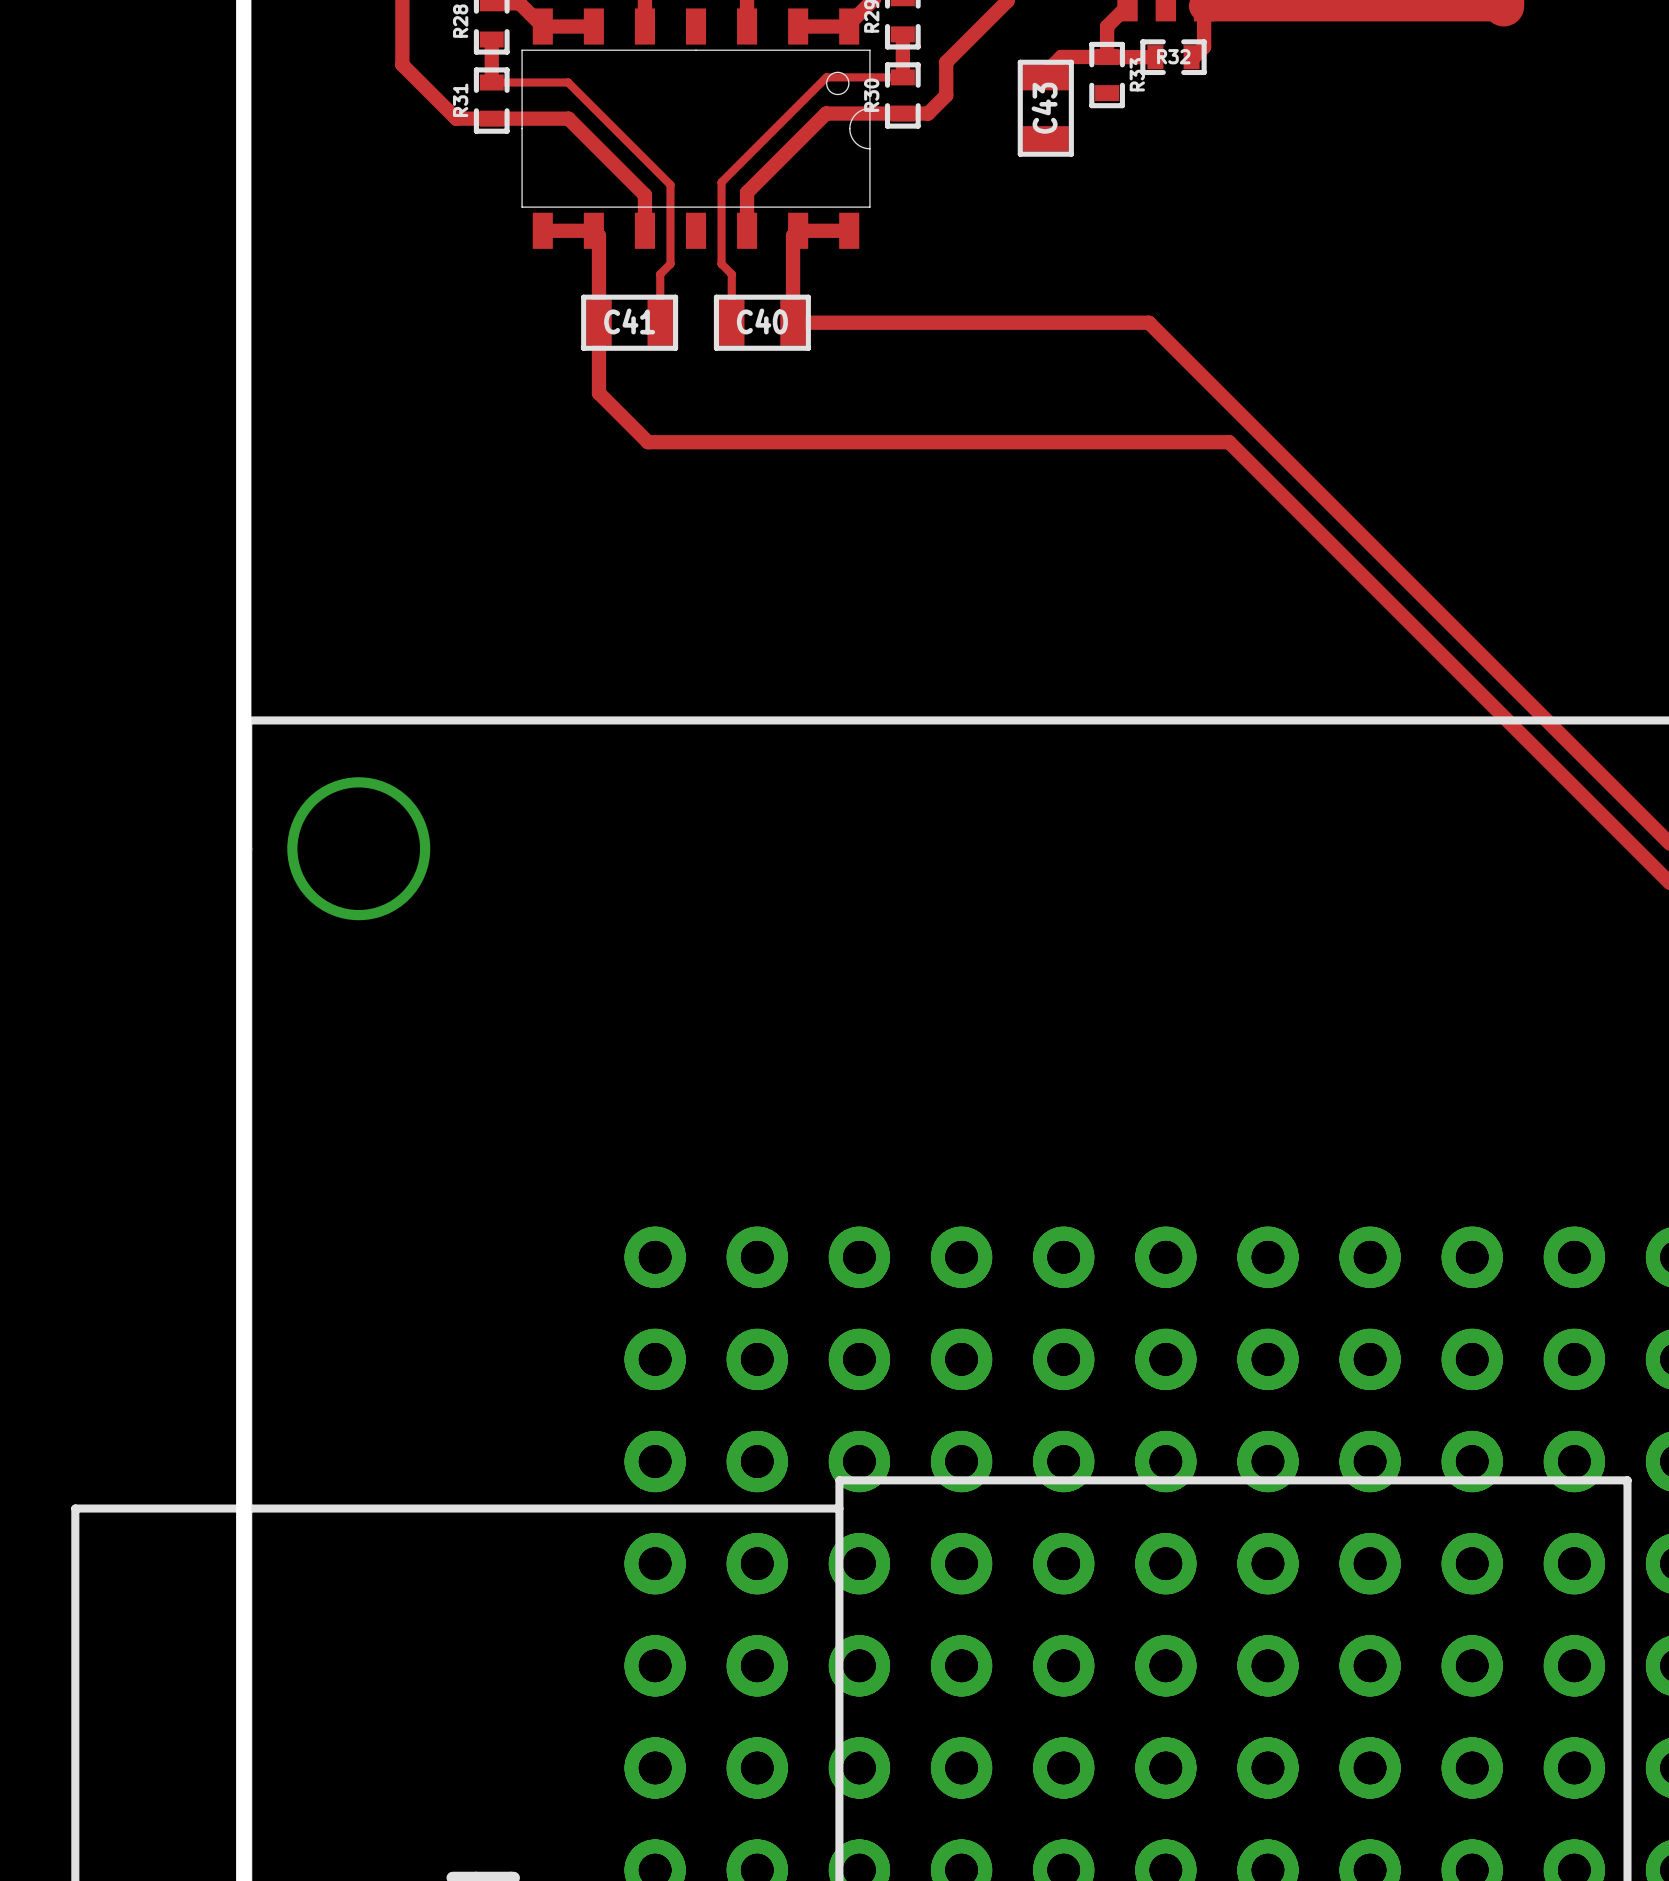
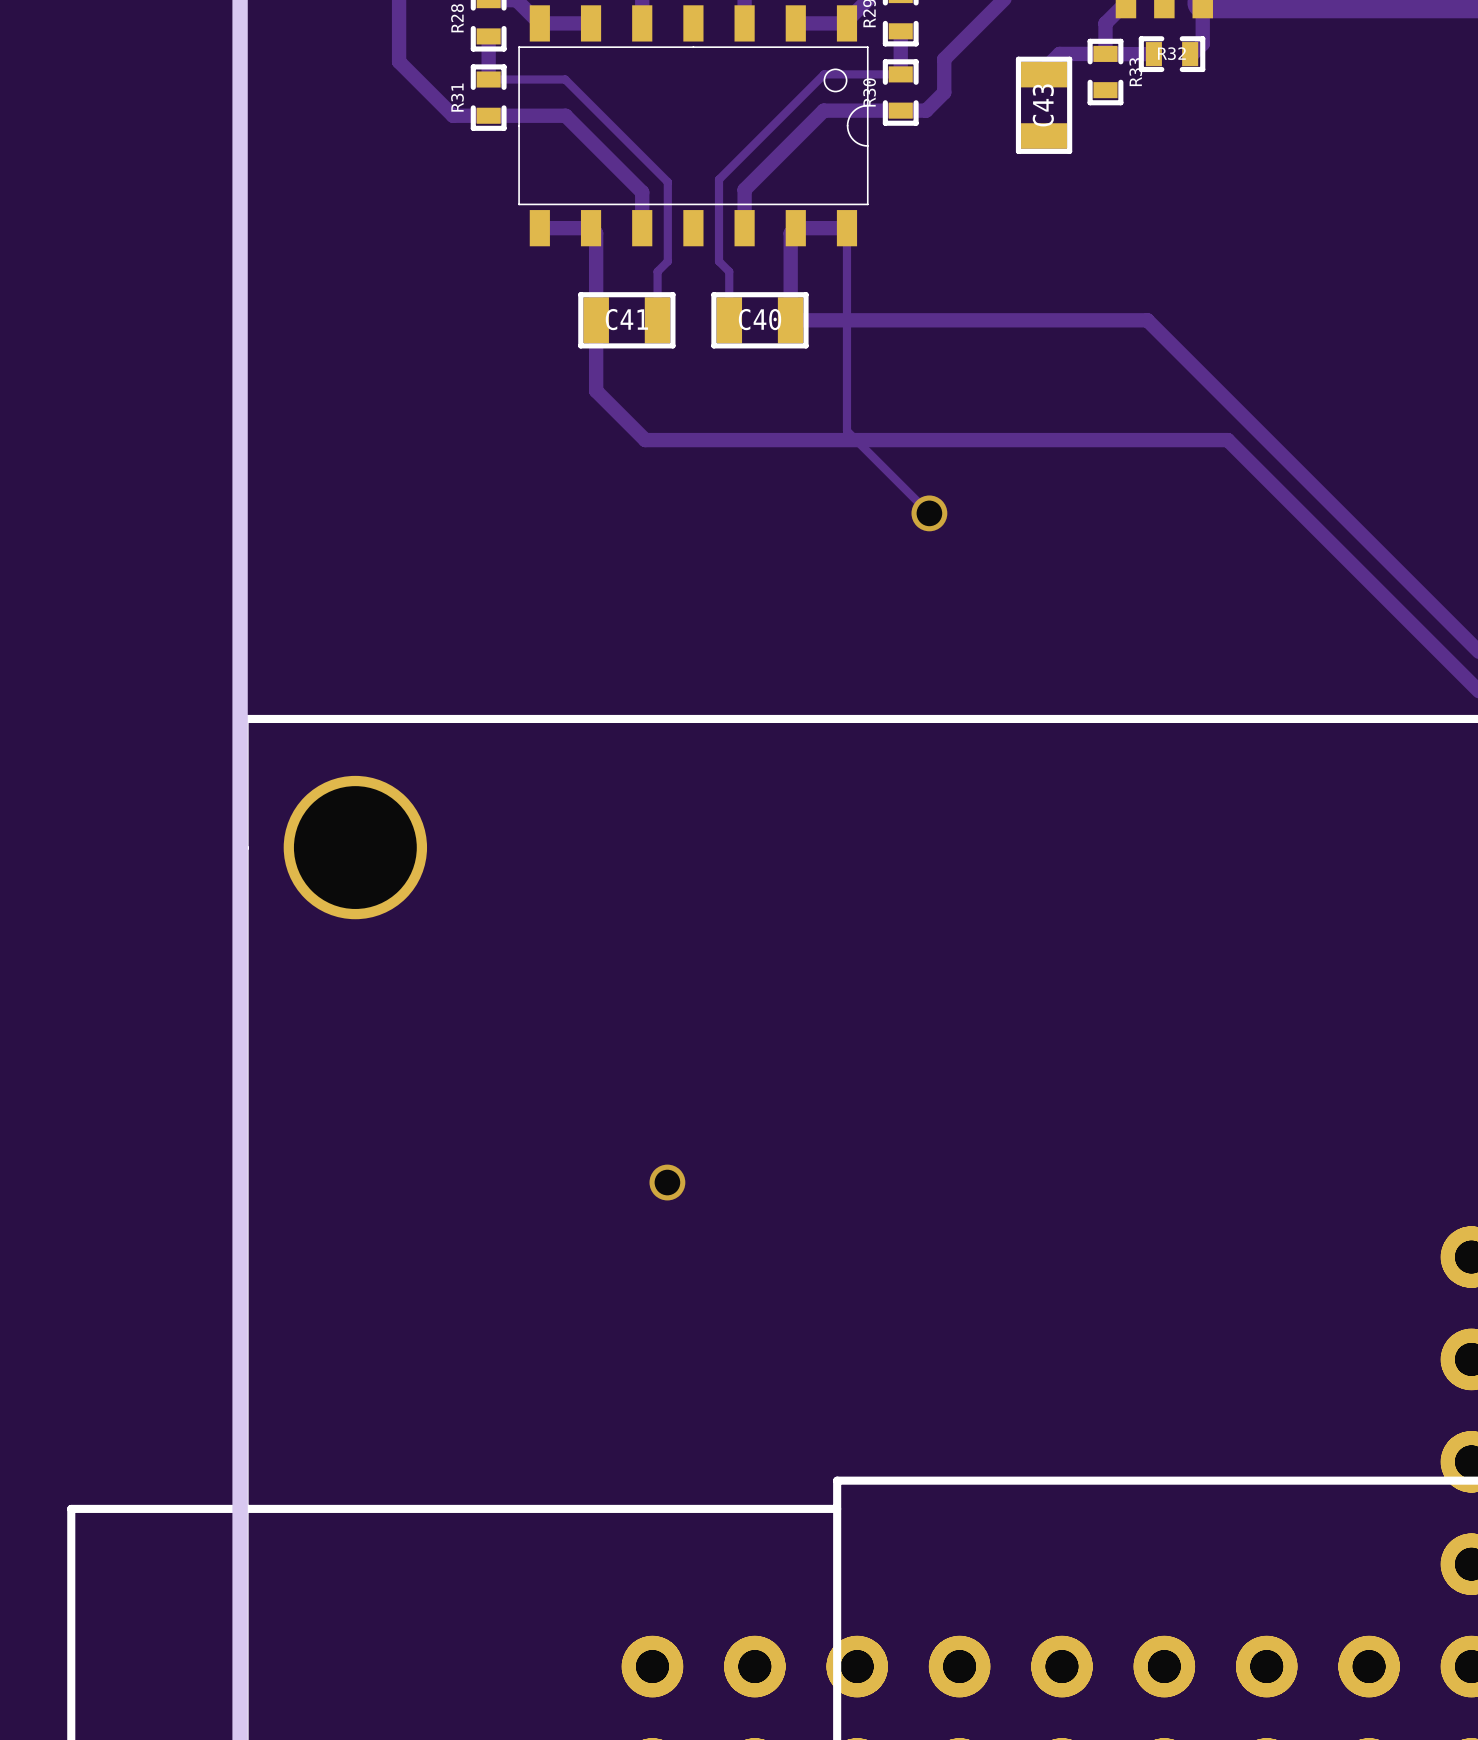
track: none -> (846, 228) (846, 430) (929, 513)
via: none -> (929, 513)
via: none -> (667, 1182)
part: (808, 1410) -> none
part: (1216, 1410) -> none

